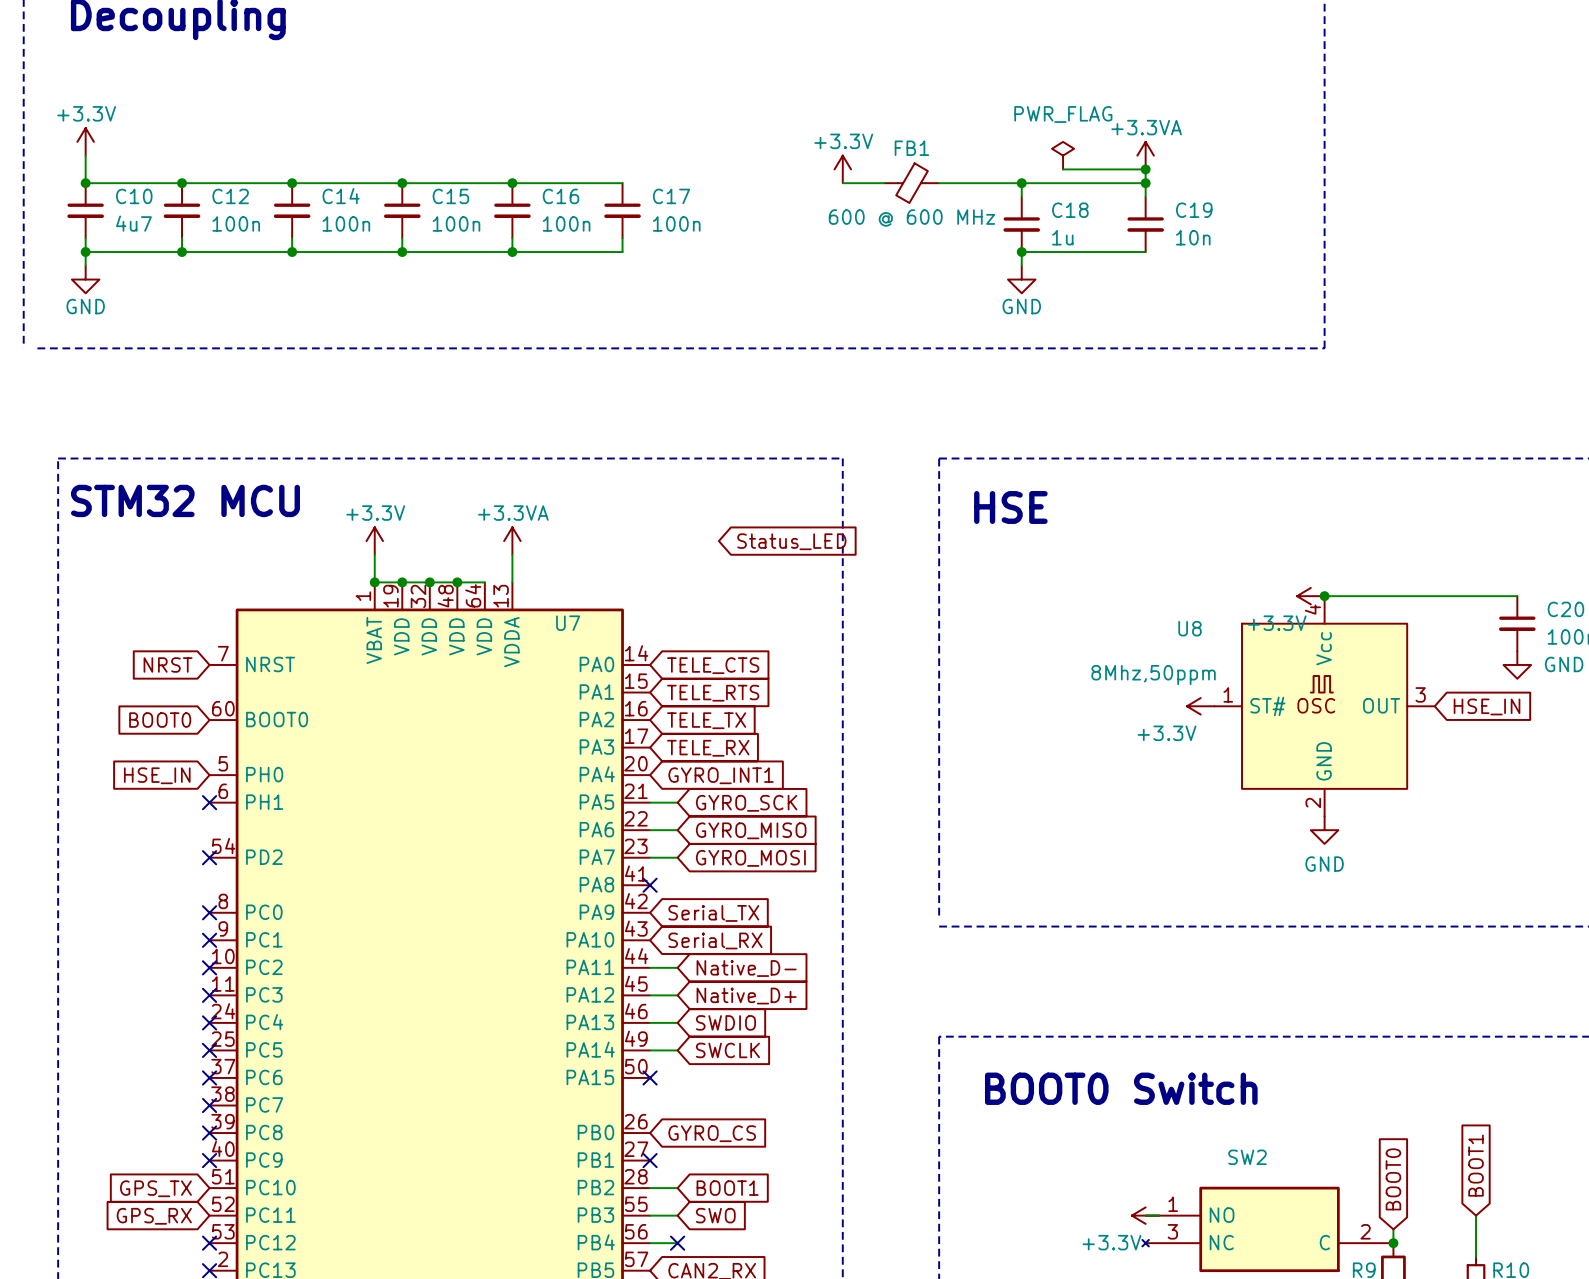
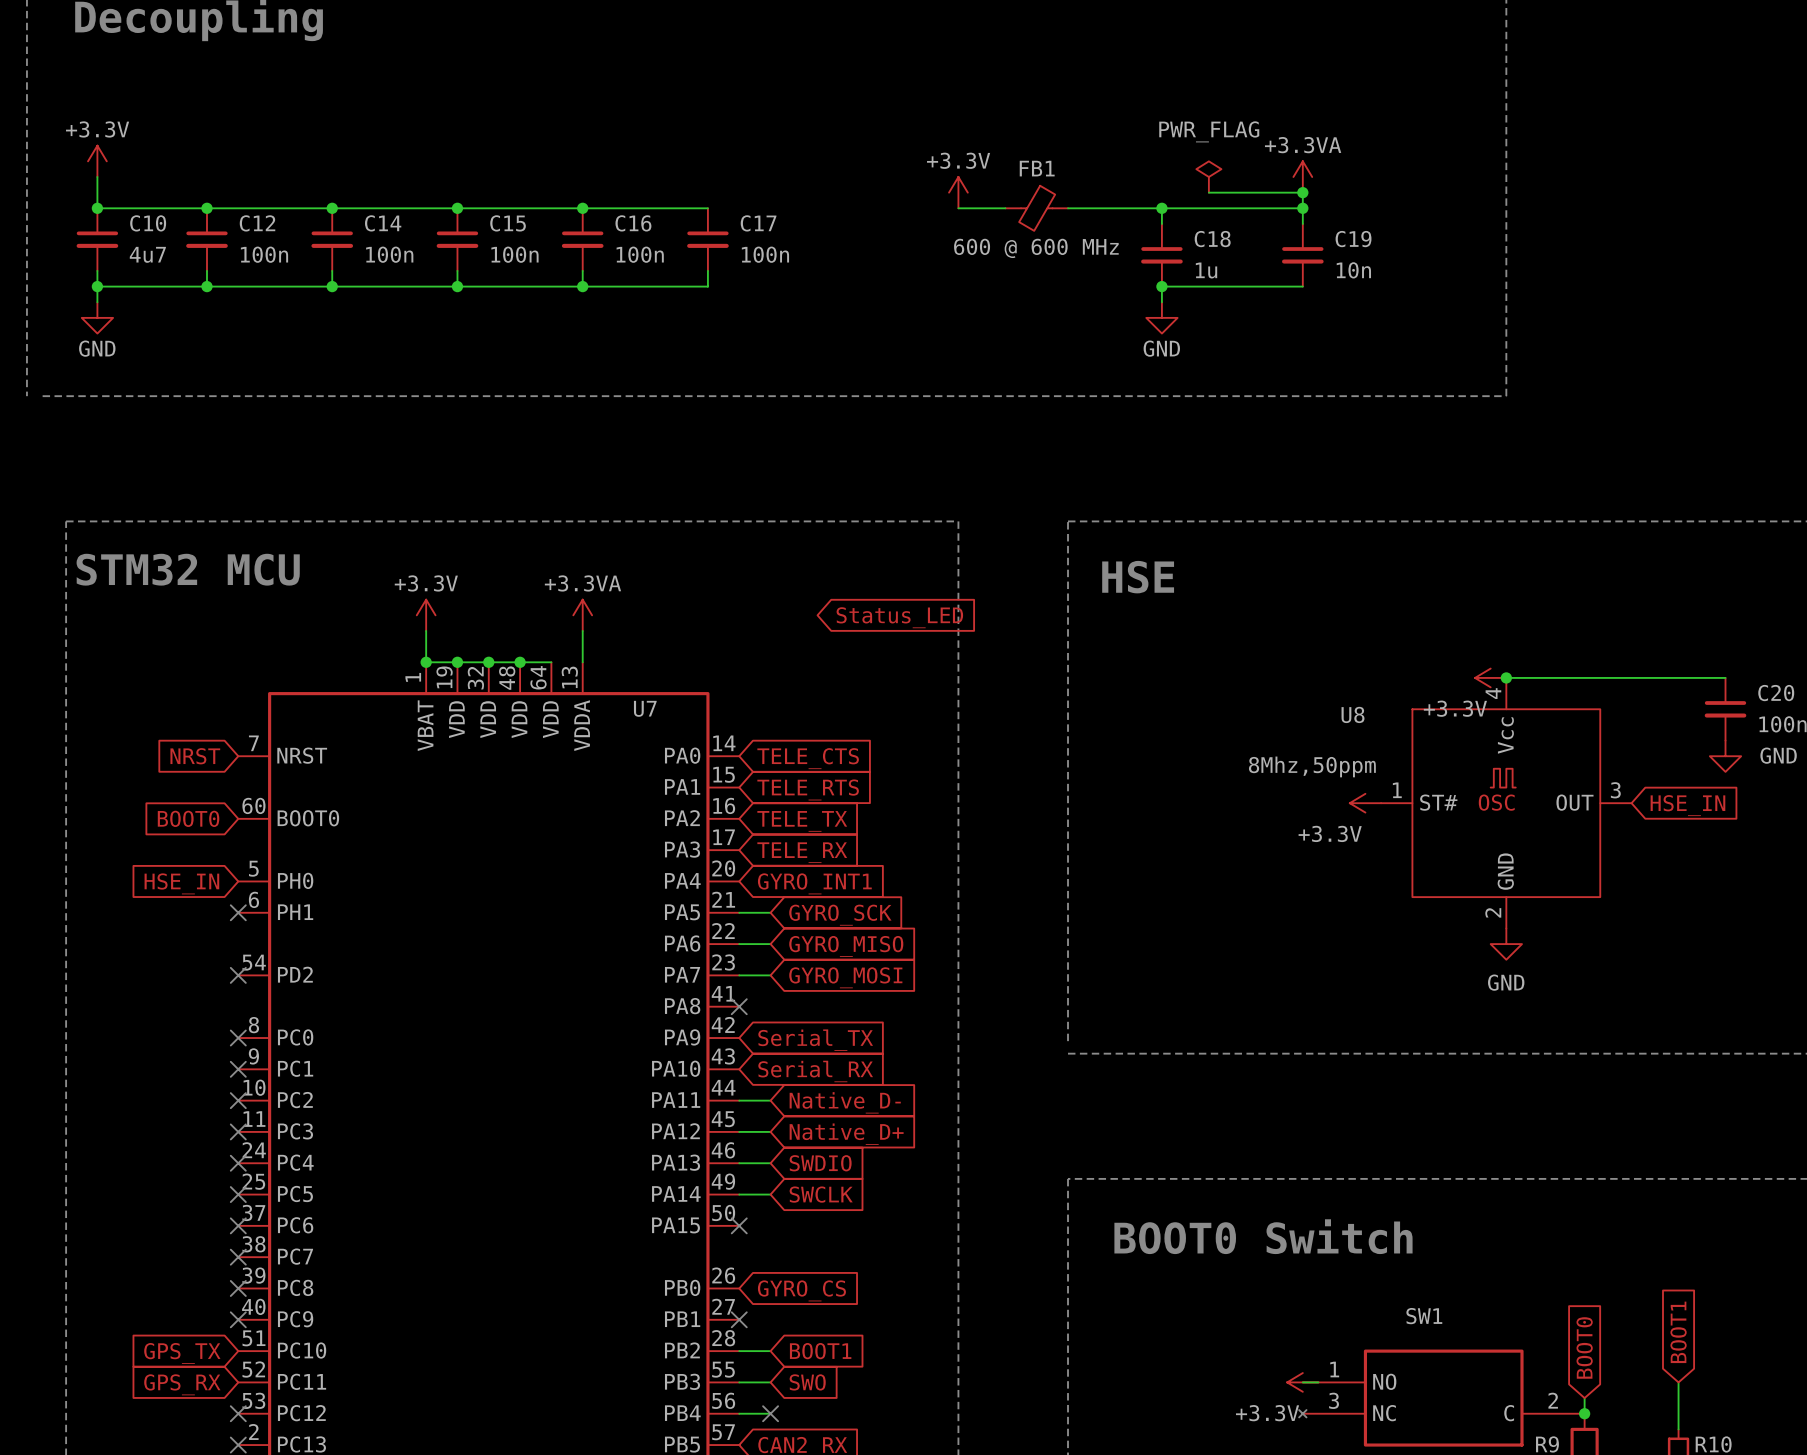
SW2 name: SW2 (1247, 1157) -> SW1 (1424, 1316)

